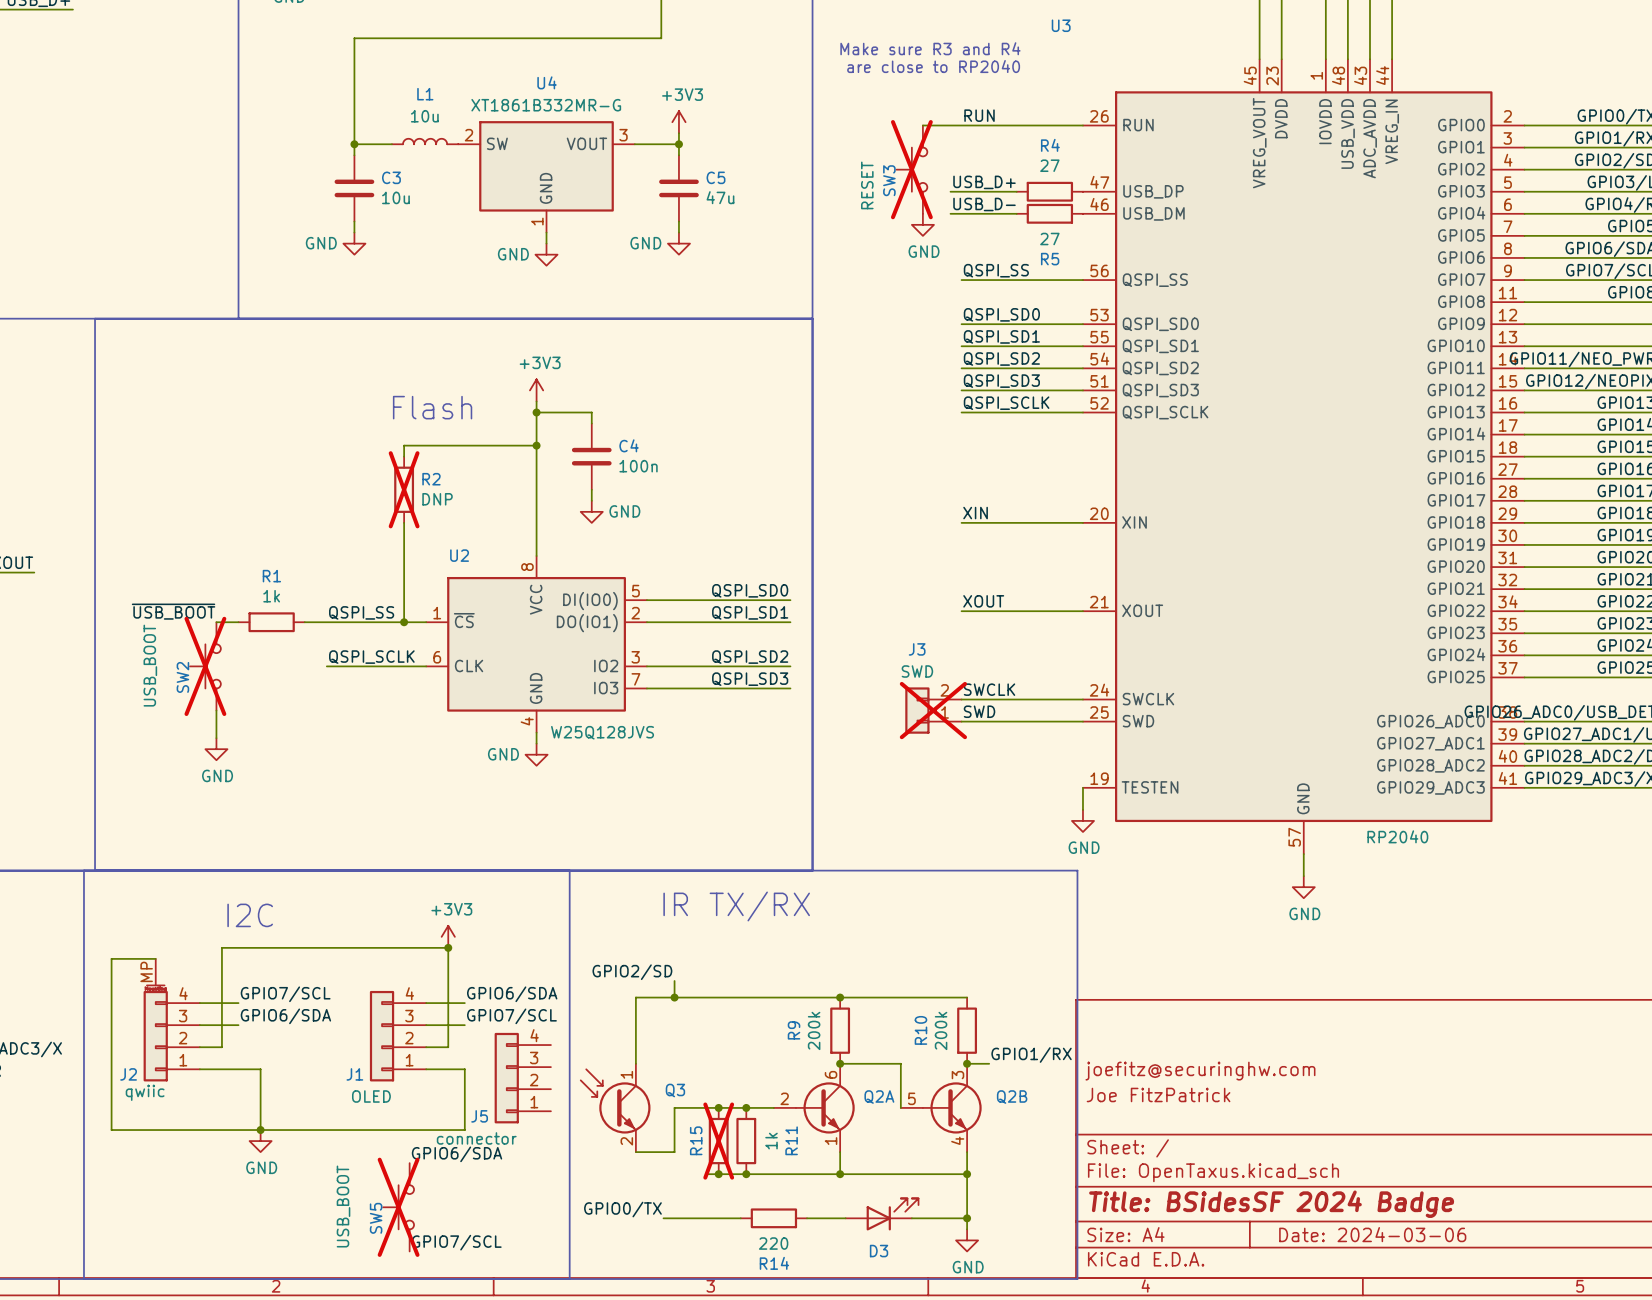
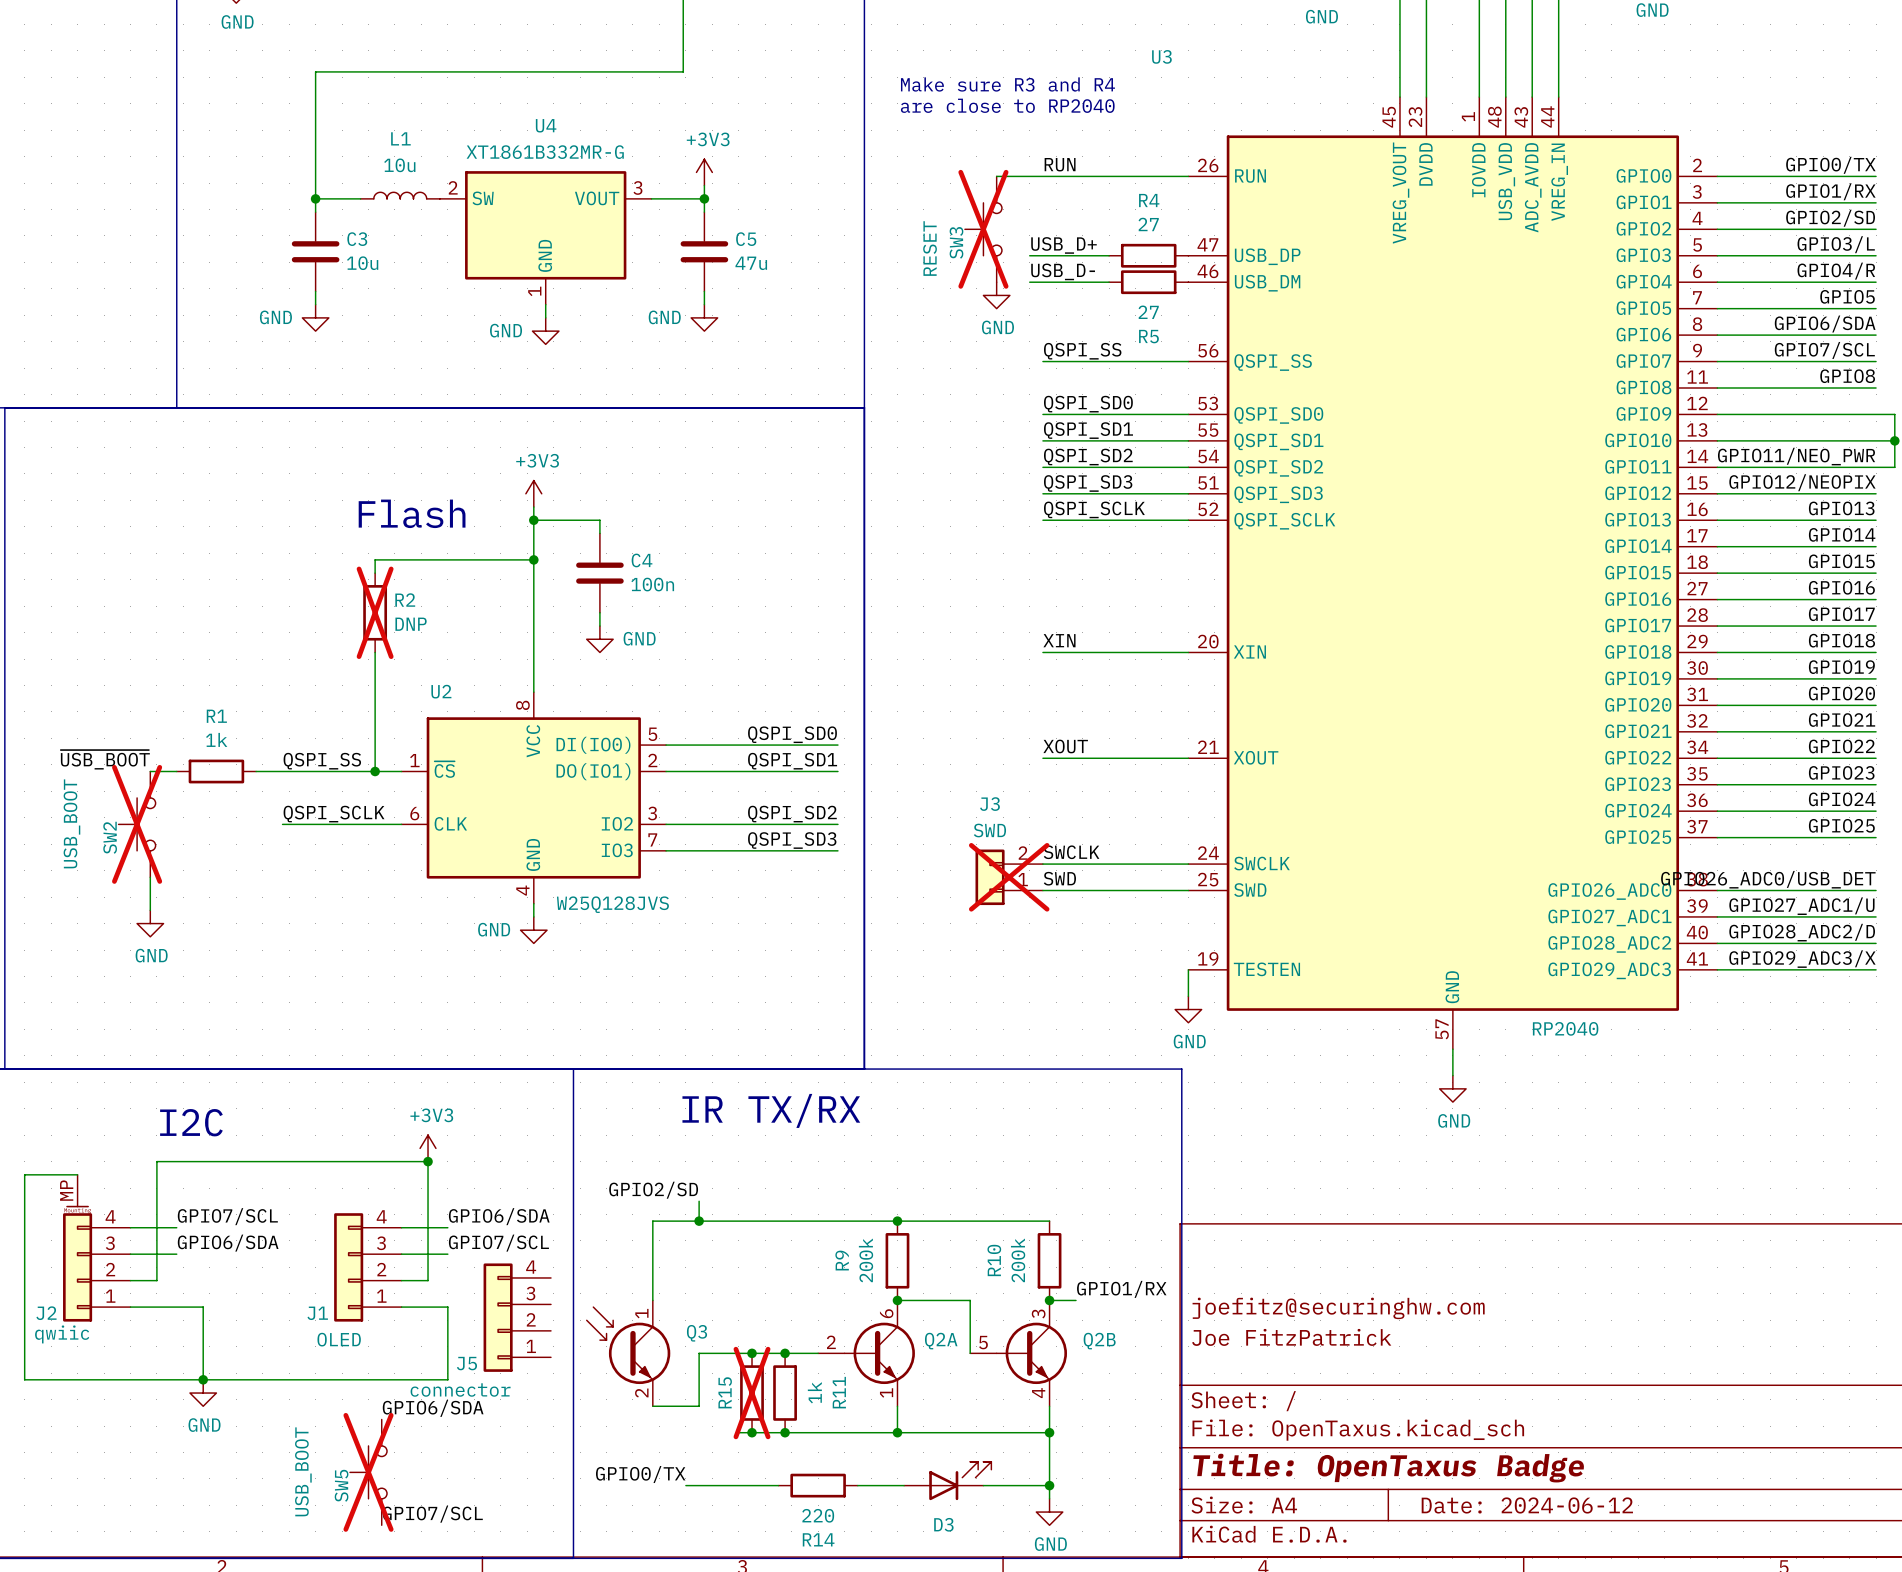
title block: Title: BSidesSF 2024 Badge (1271, 1204) -> Title: OpenTaxus Badge (1388, 1468)
title block: Date: 2024-03-06 (1372, 1234) -> Date: 2024-06-12 (1527, 1505)

